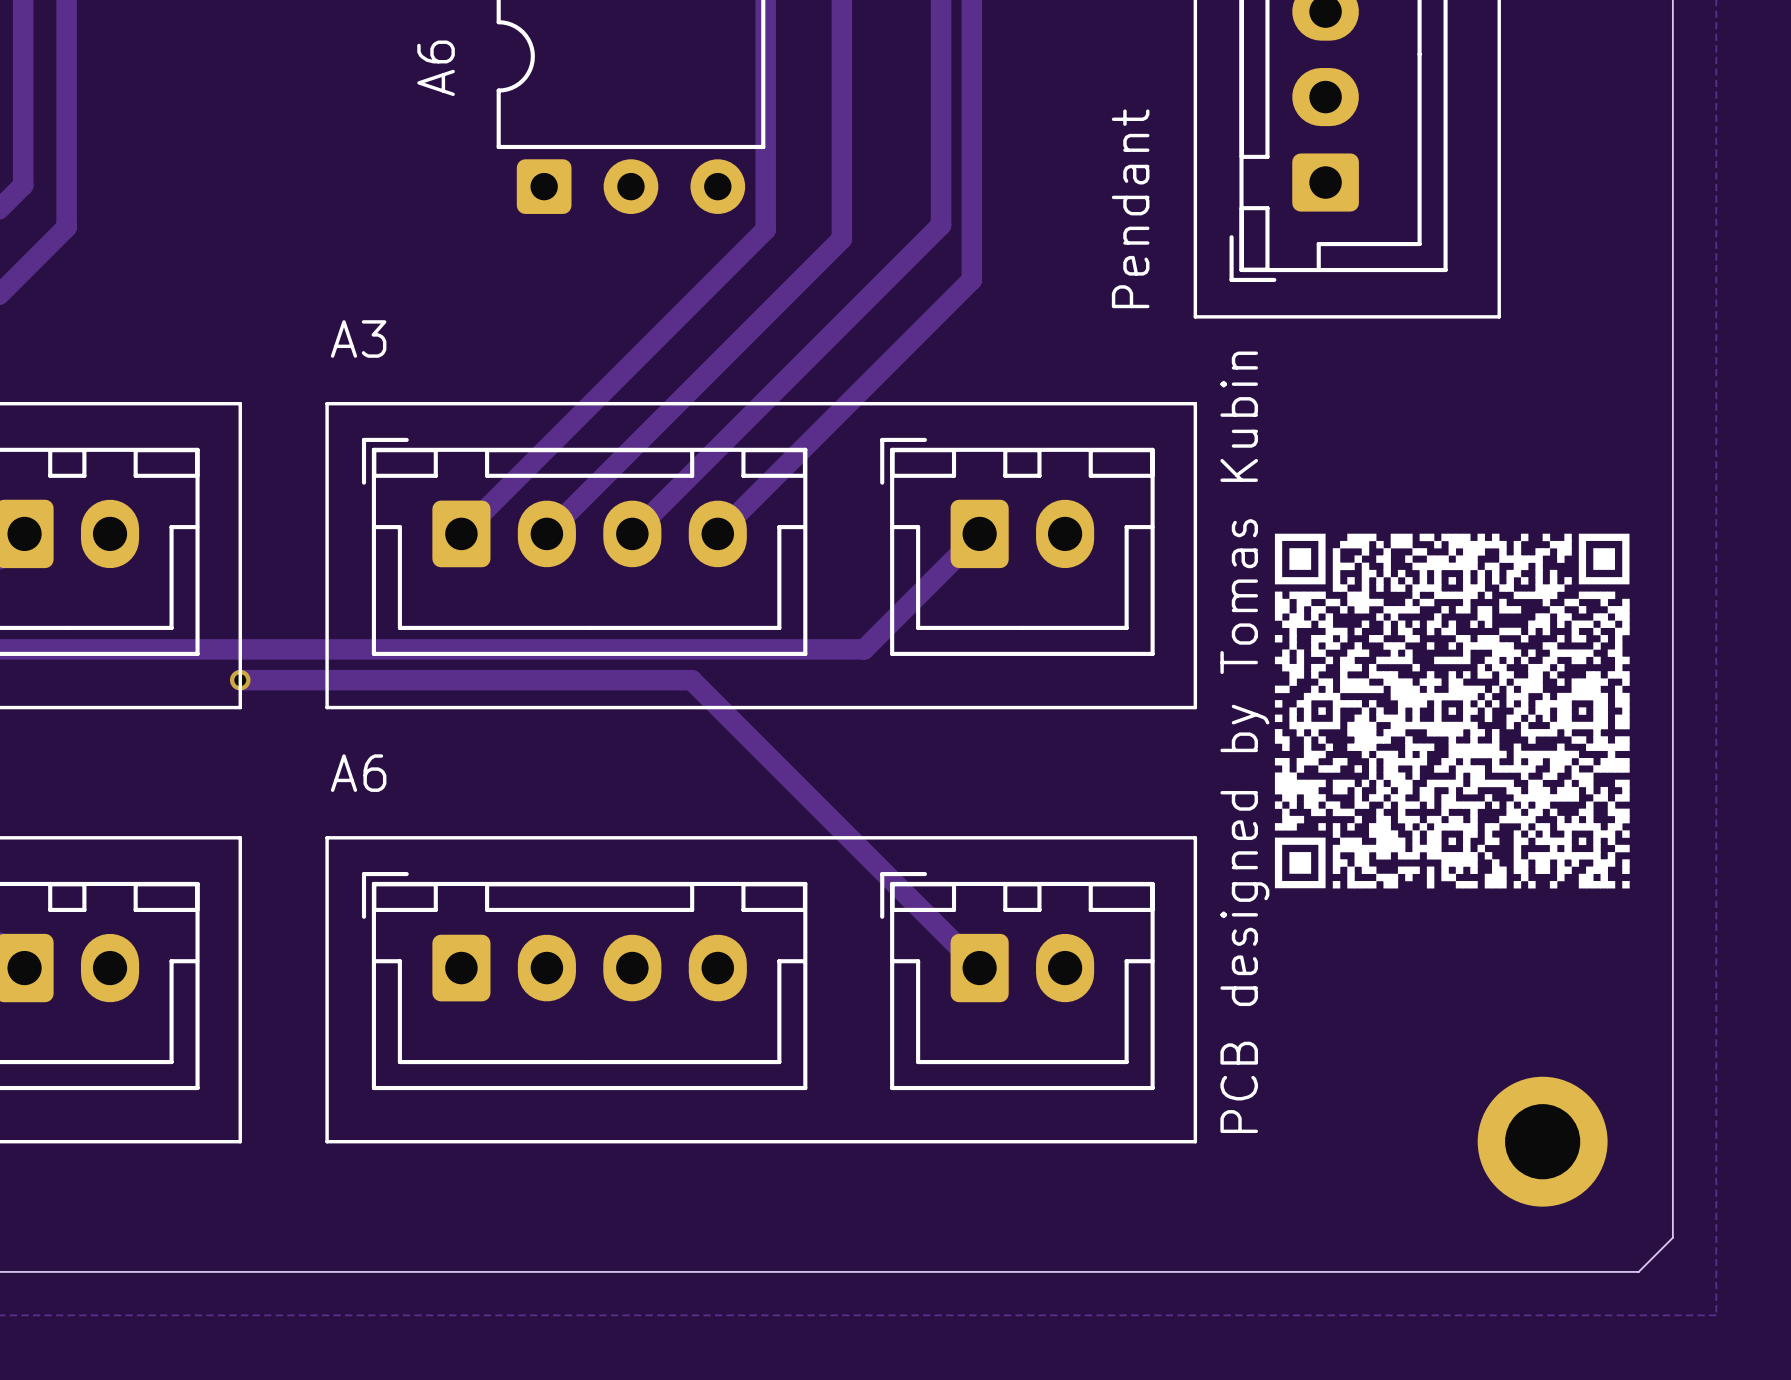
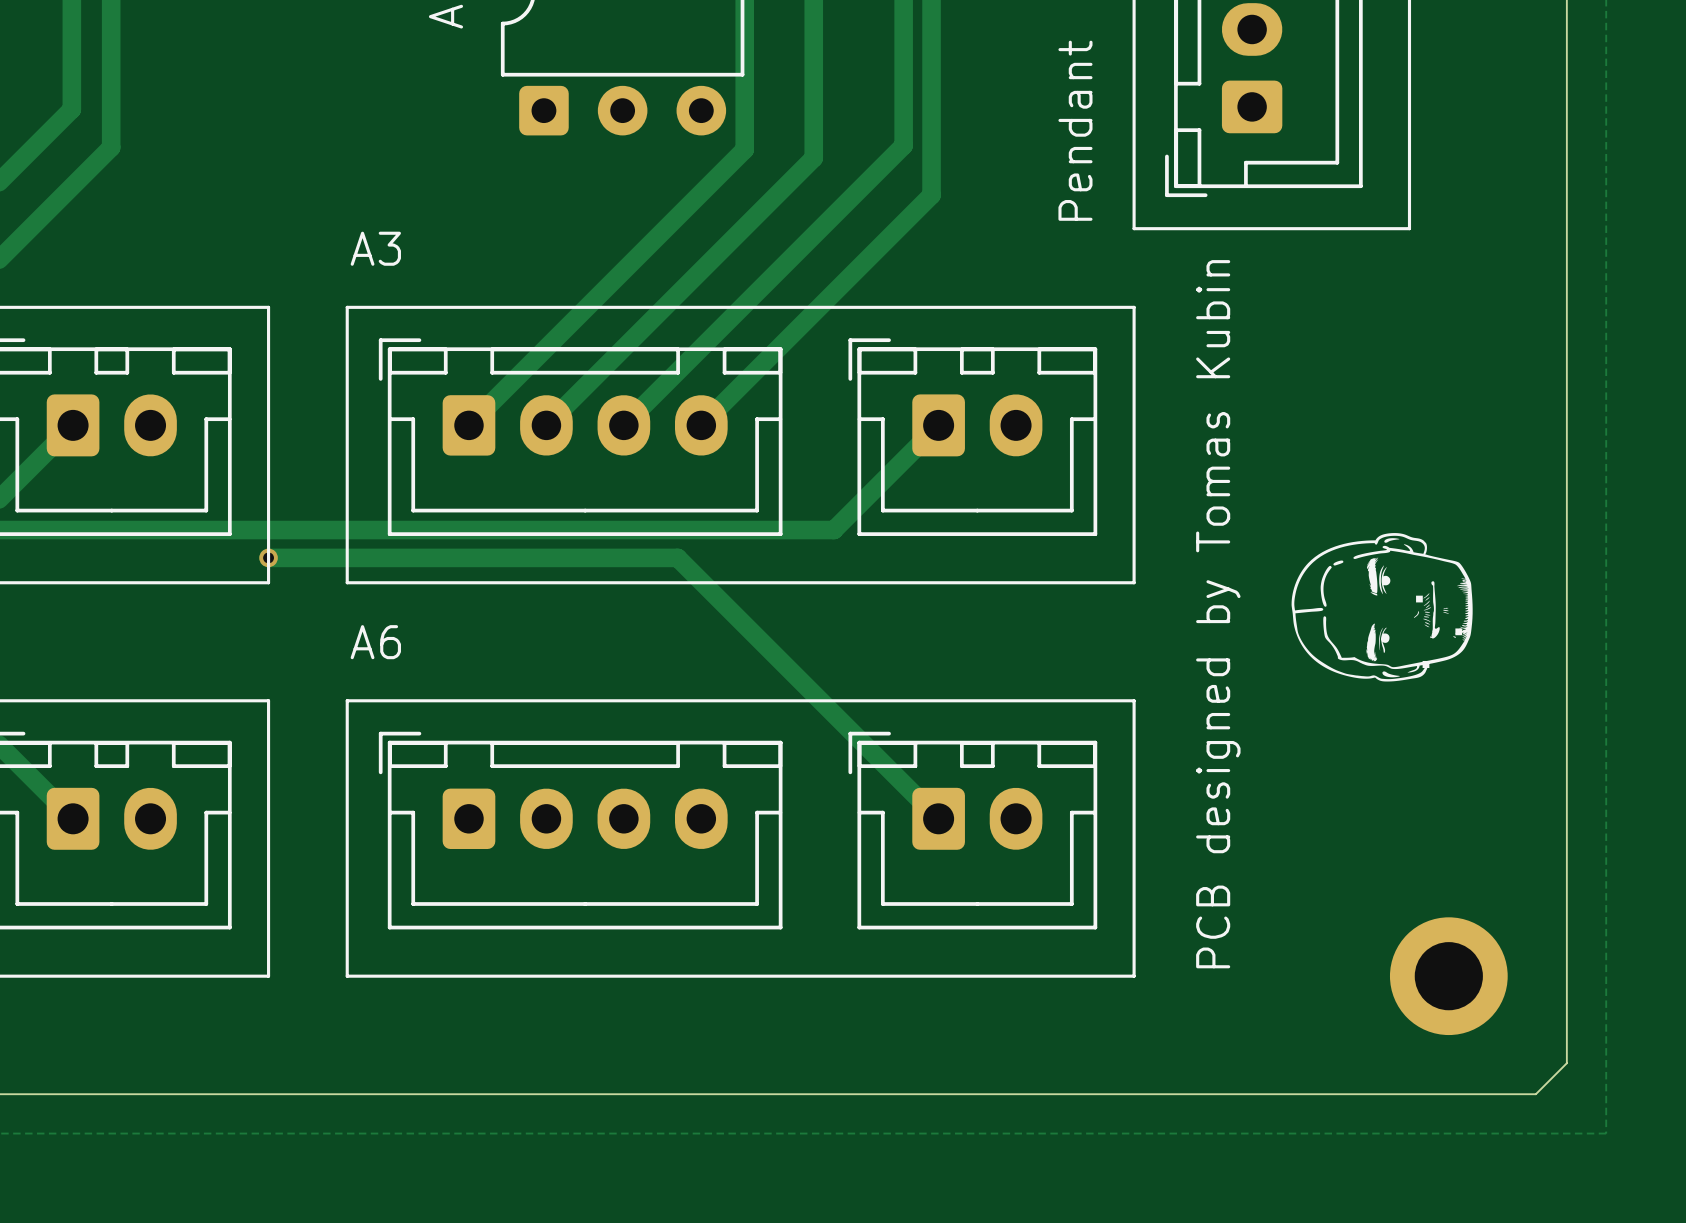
drawing: [1274, 533, 1630, 889] -> none
drawing: none -> [1291, 533, 1473, 682]
drawing shape: [1484, 656, 1493, 665] -> [1384, 538, 1400, 543]
drawing shape: [1455, 692, 1464, 701] -> [1366, 557, 1379, 594]
drawing shape: [1463, 700, 1471, 708] -> [1379, 565, 1385, 595]
drawing shape: [1535, 729, 1543, 737] -> [1443, 607, 1449, 610]
text position: PCB designed by Tomas Kubin (1244, 742) -> PCB designed by Tomas Kubin (1218, 614)
drawing shape: [1463, 765, 1471, 773] -> [1379, 627, 1384, 651]
drawing shape: [1549, 765, 1558, 773] -> [1453, 636, 1457, 638]

